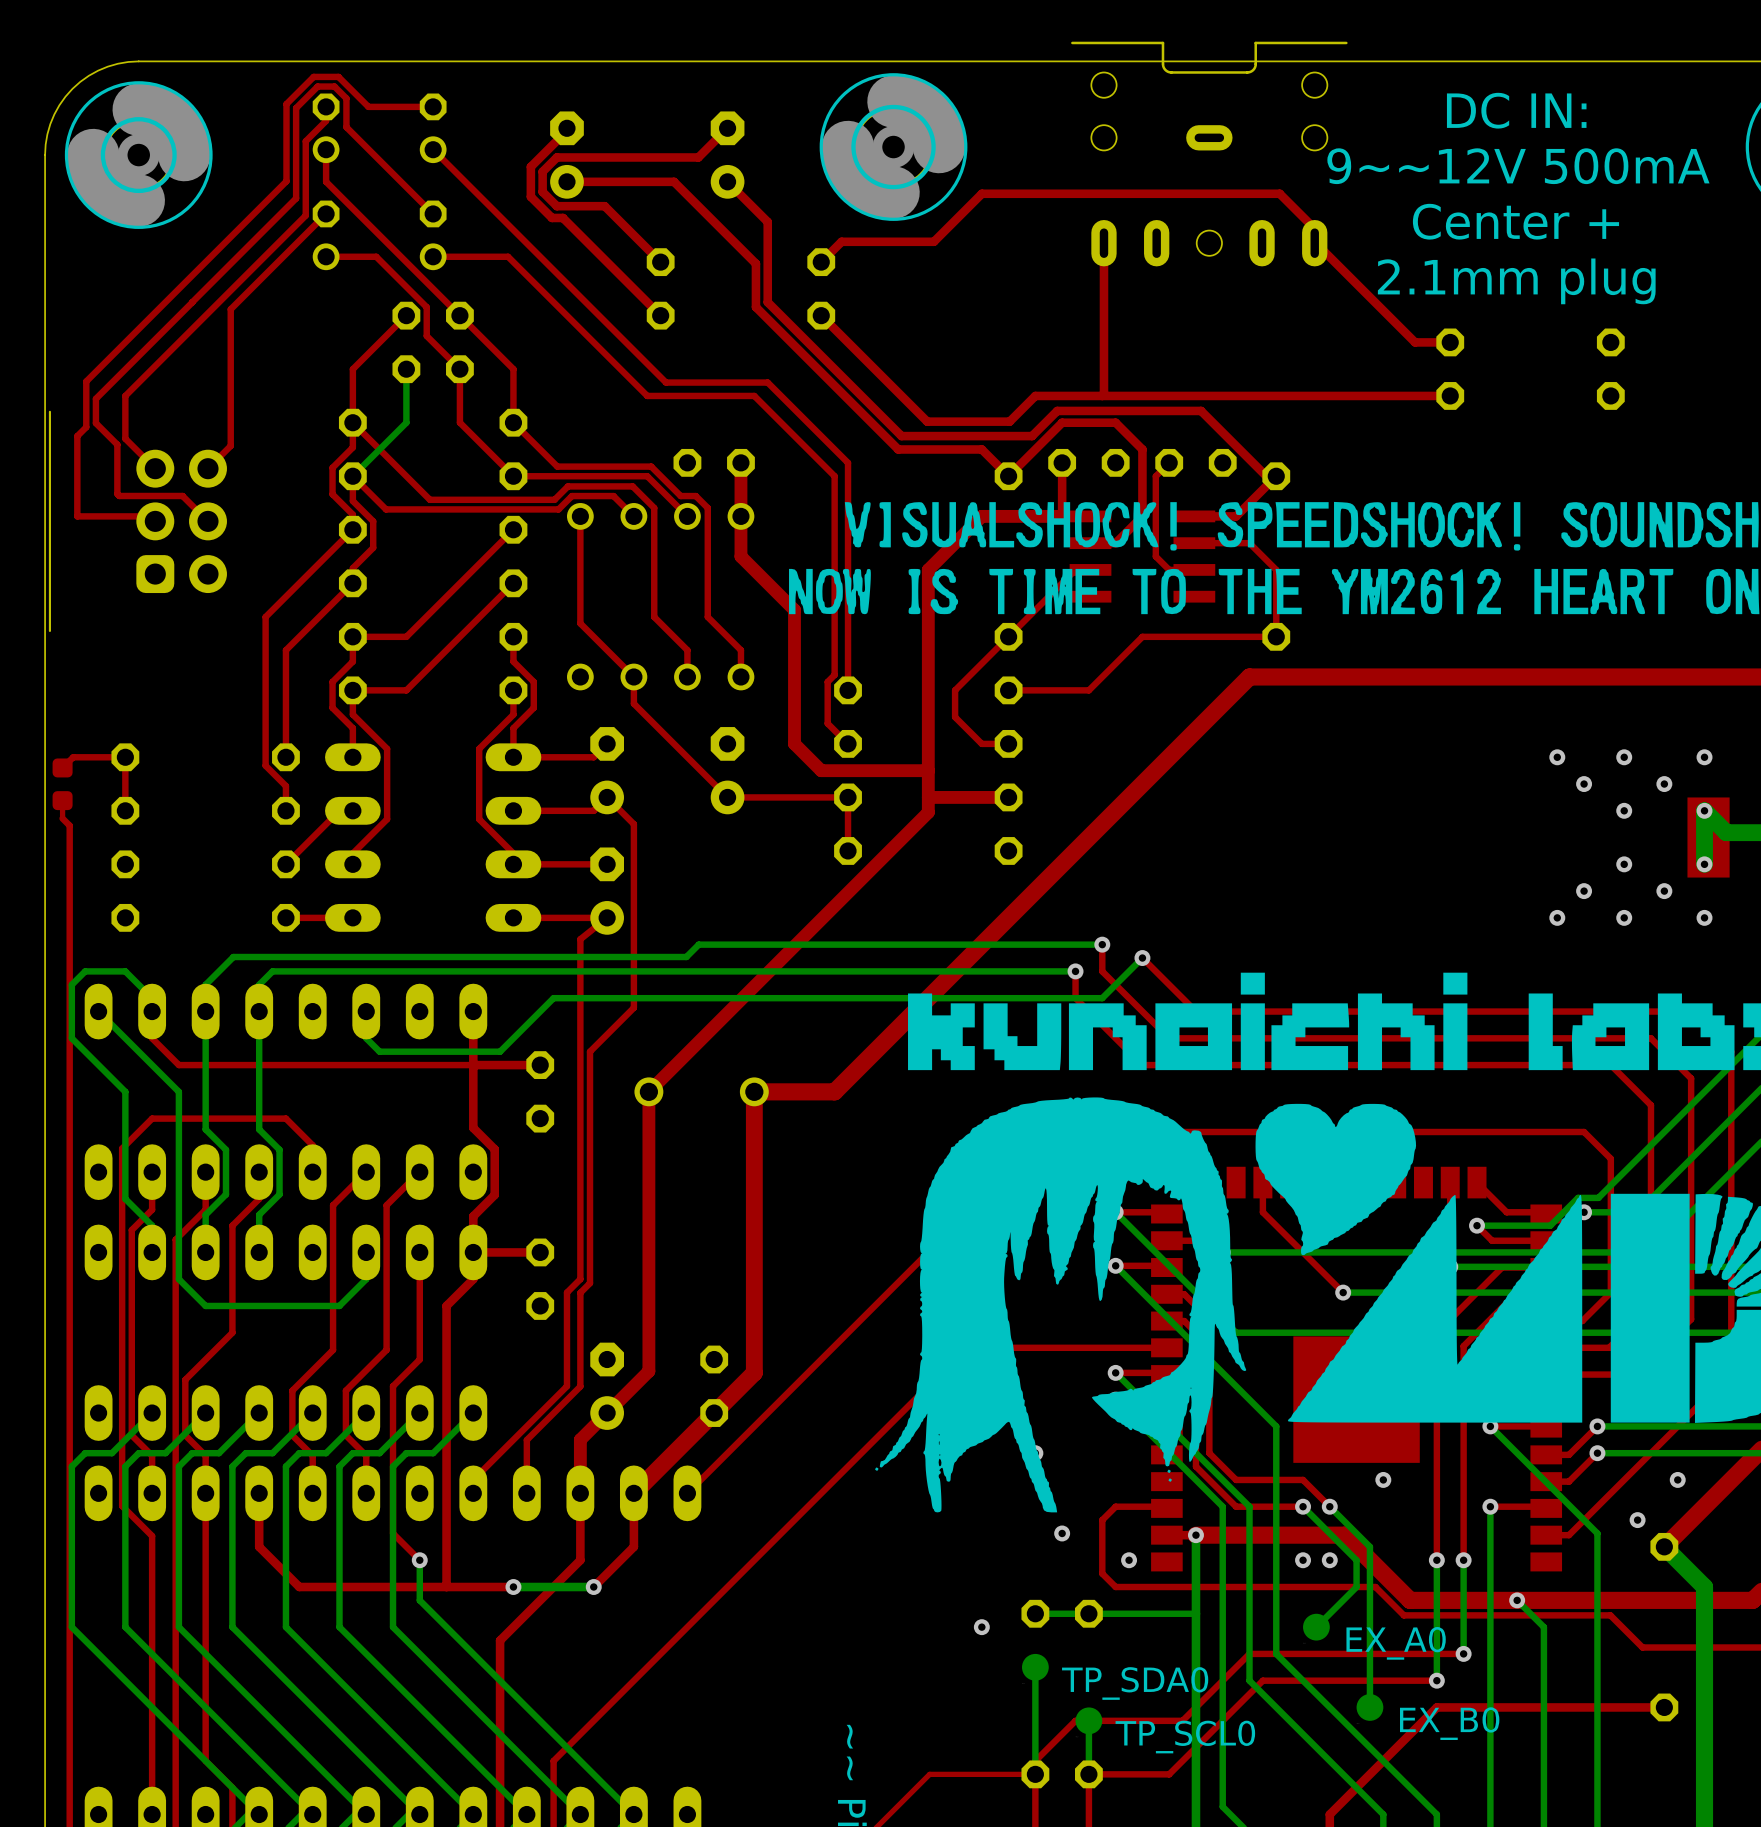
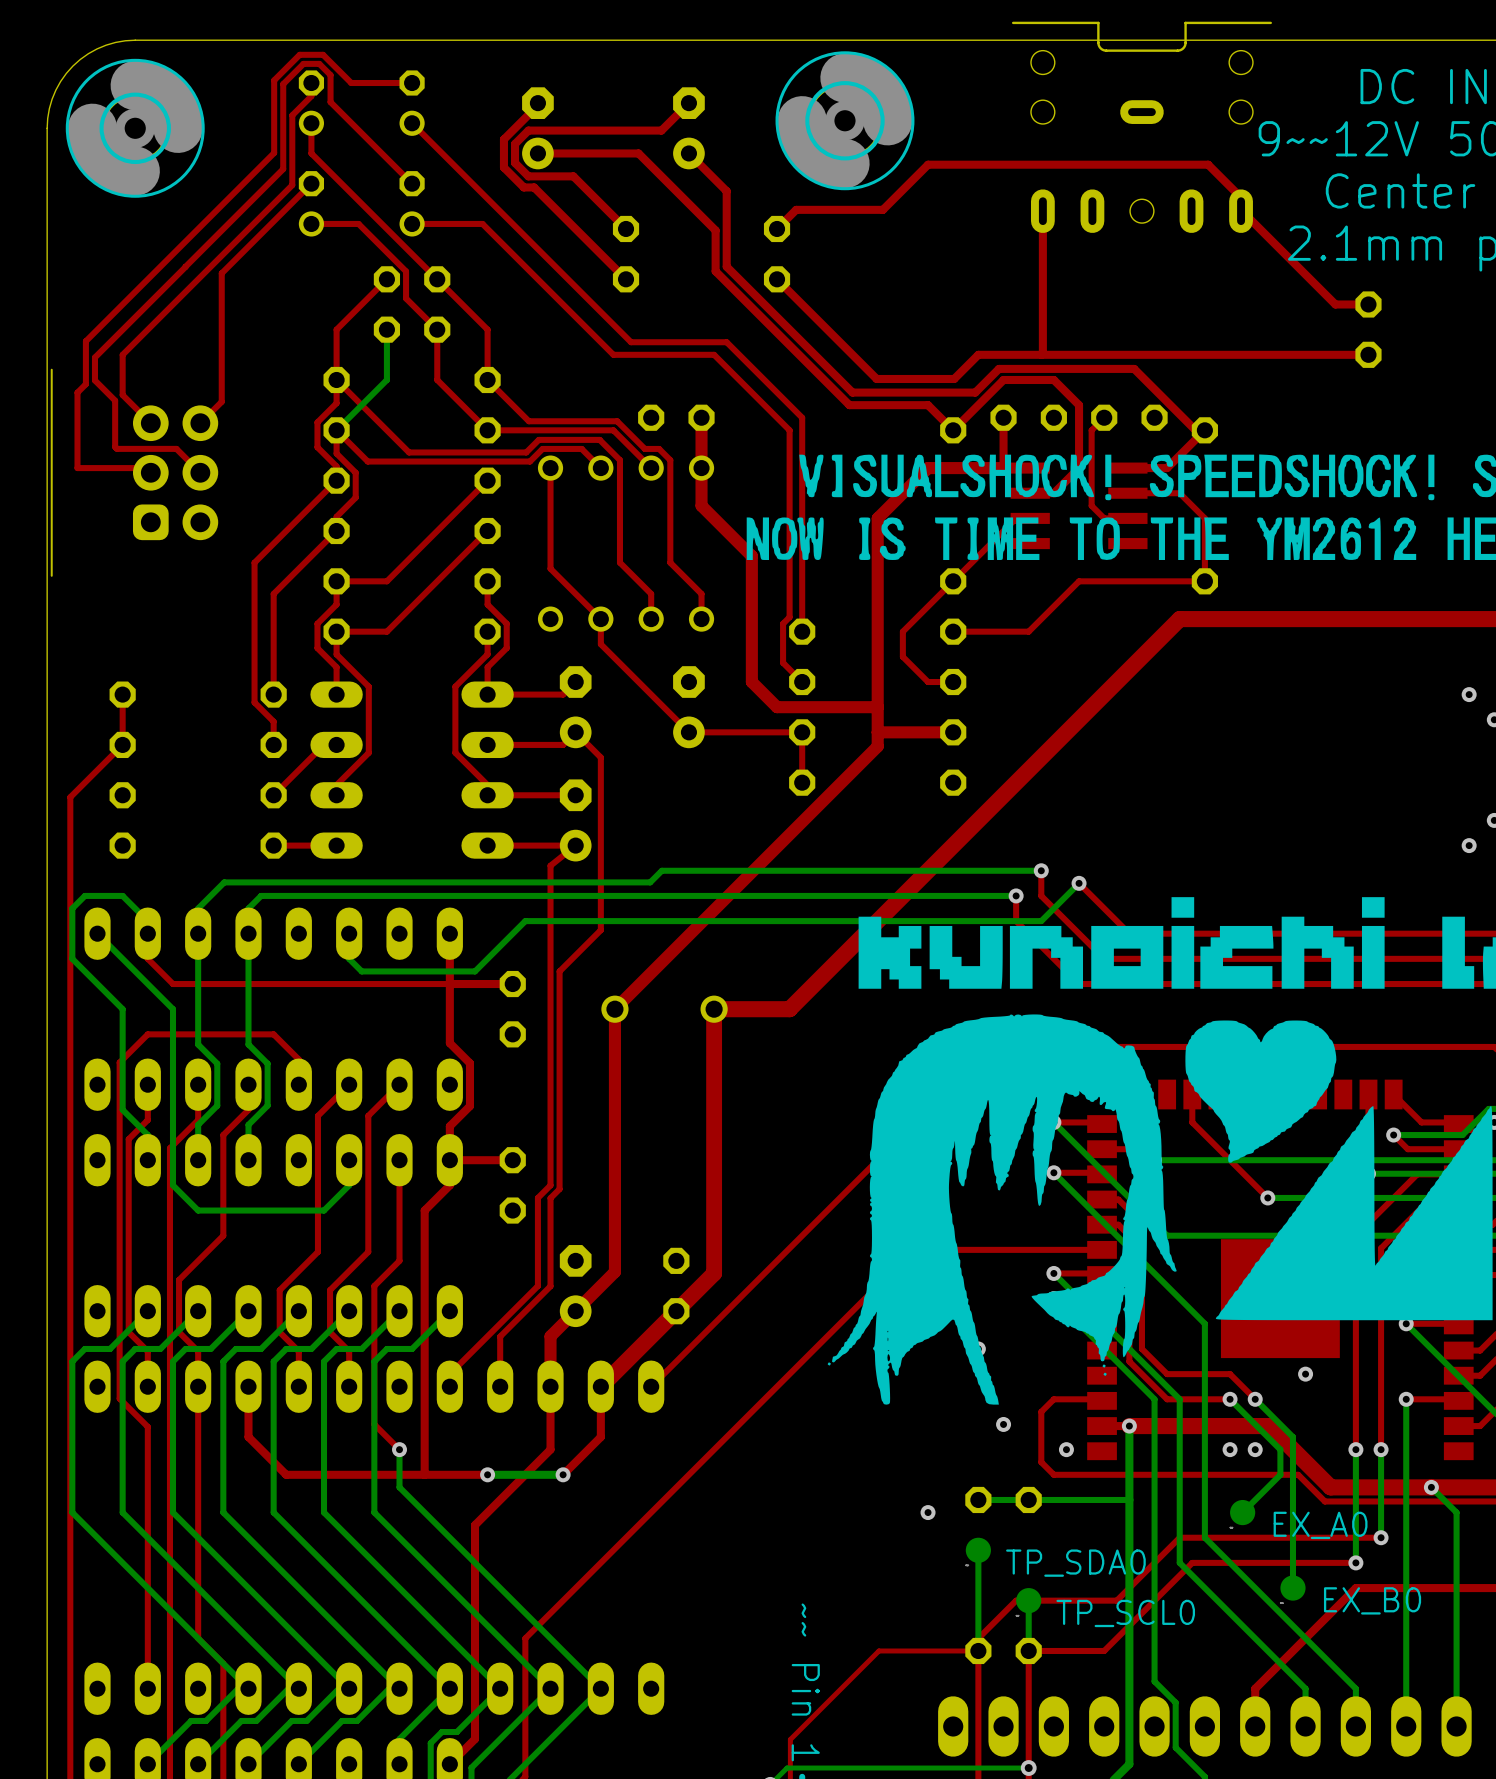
top track: (125, 757) (73, 757) (62, 767) -> none
part: (62, 784) -> none
top track: (62, 800) (62, 818) (69, 825) (69, 866) -> (122, 744) (70, 797)

